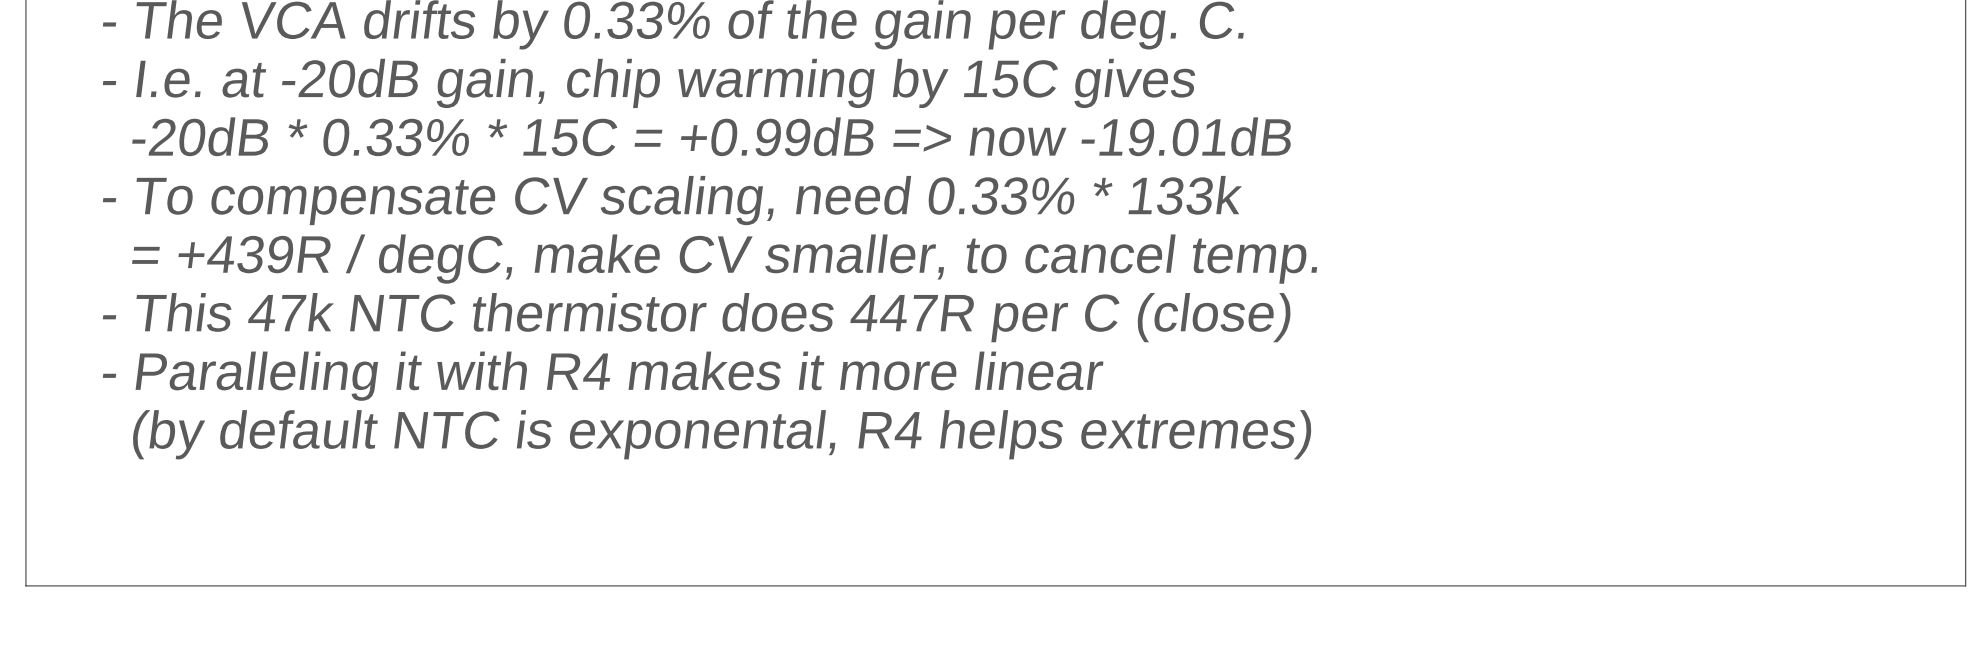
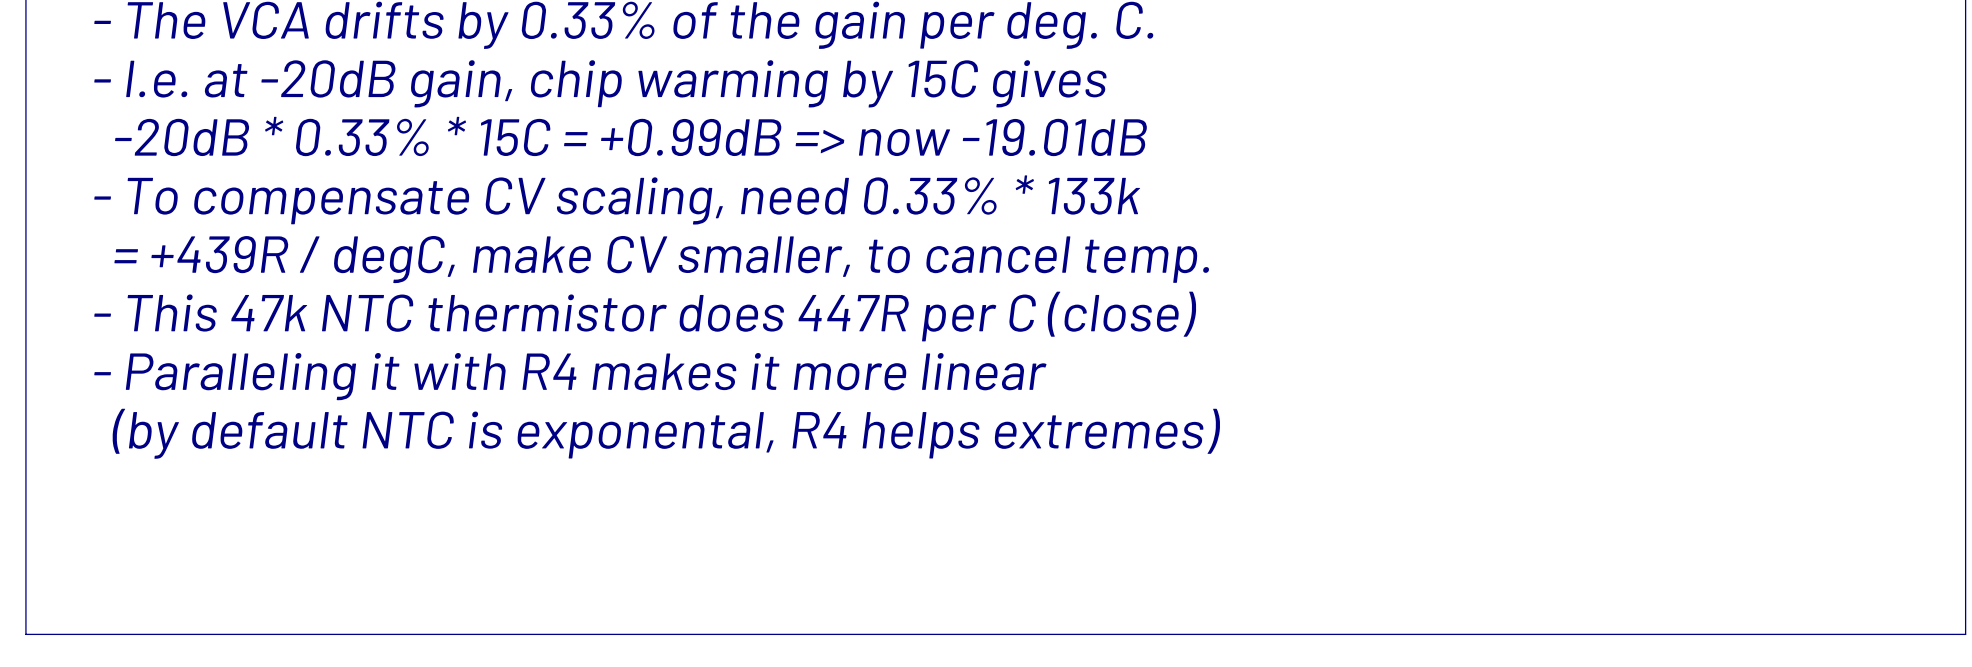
line: (25, 585) (1965, 585) -> (25, 585) (25, 634) (1965, 634) (1965, 585)

